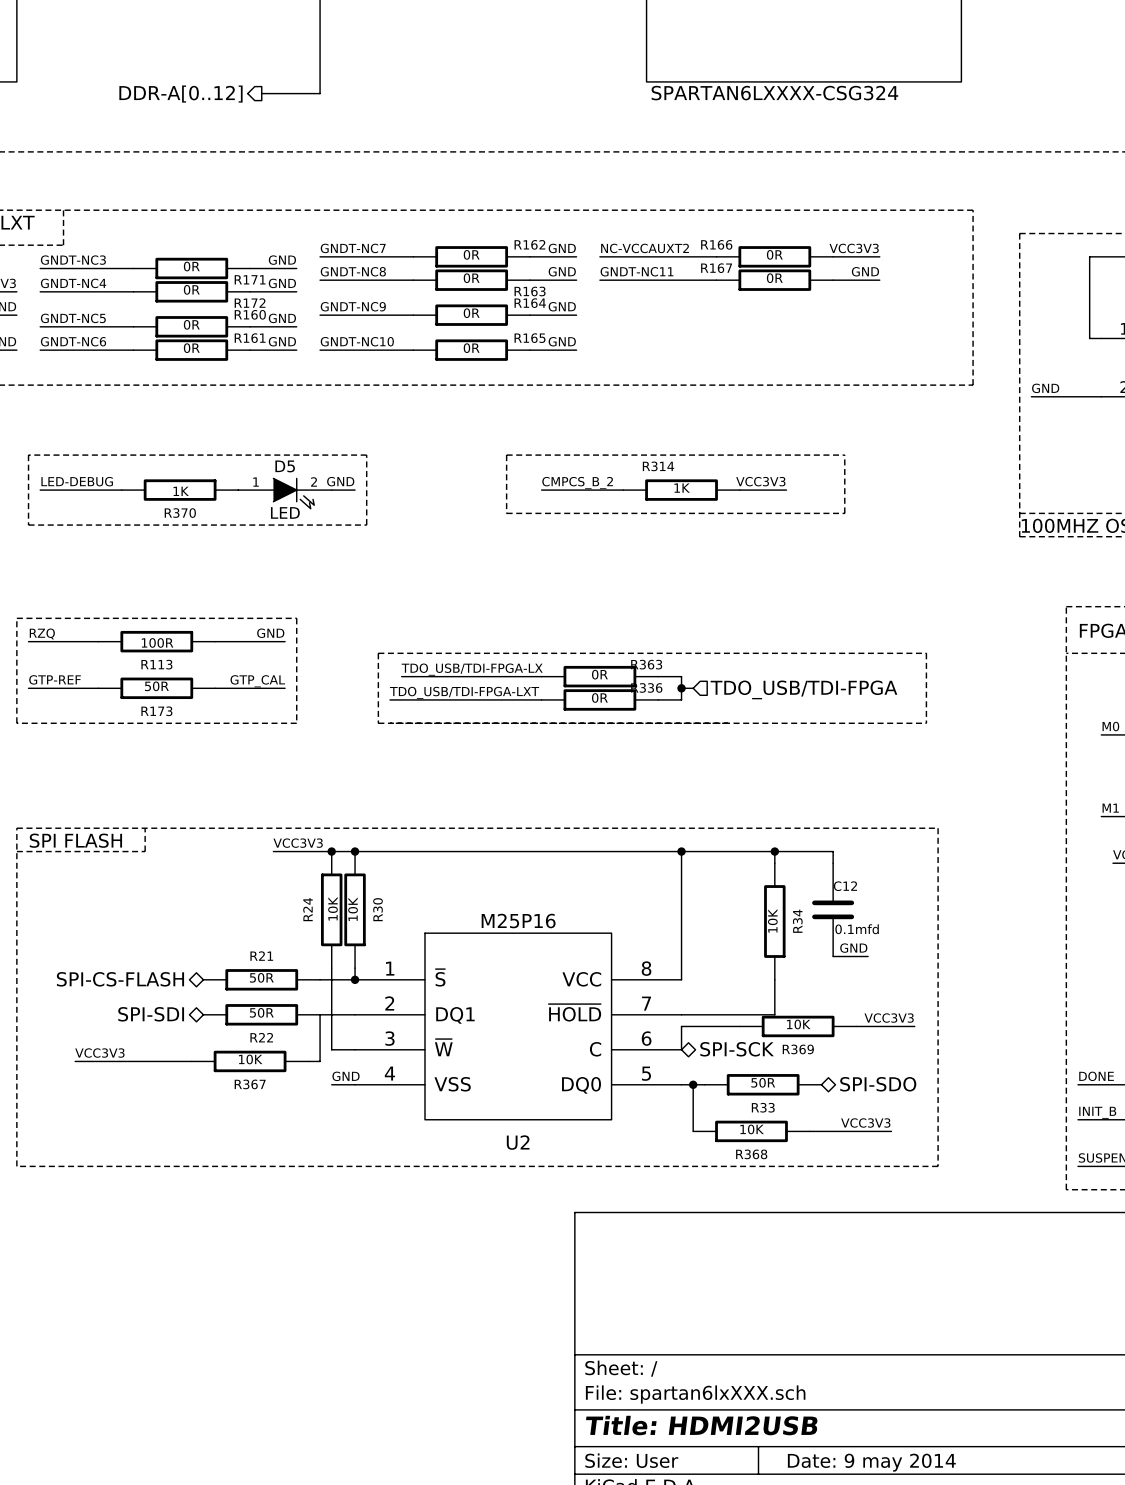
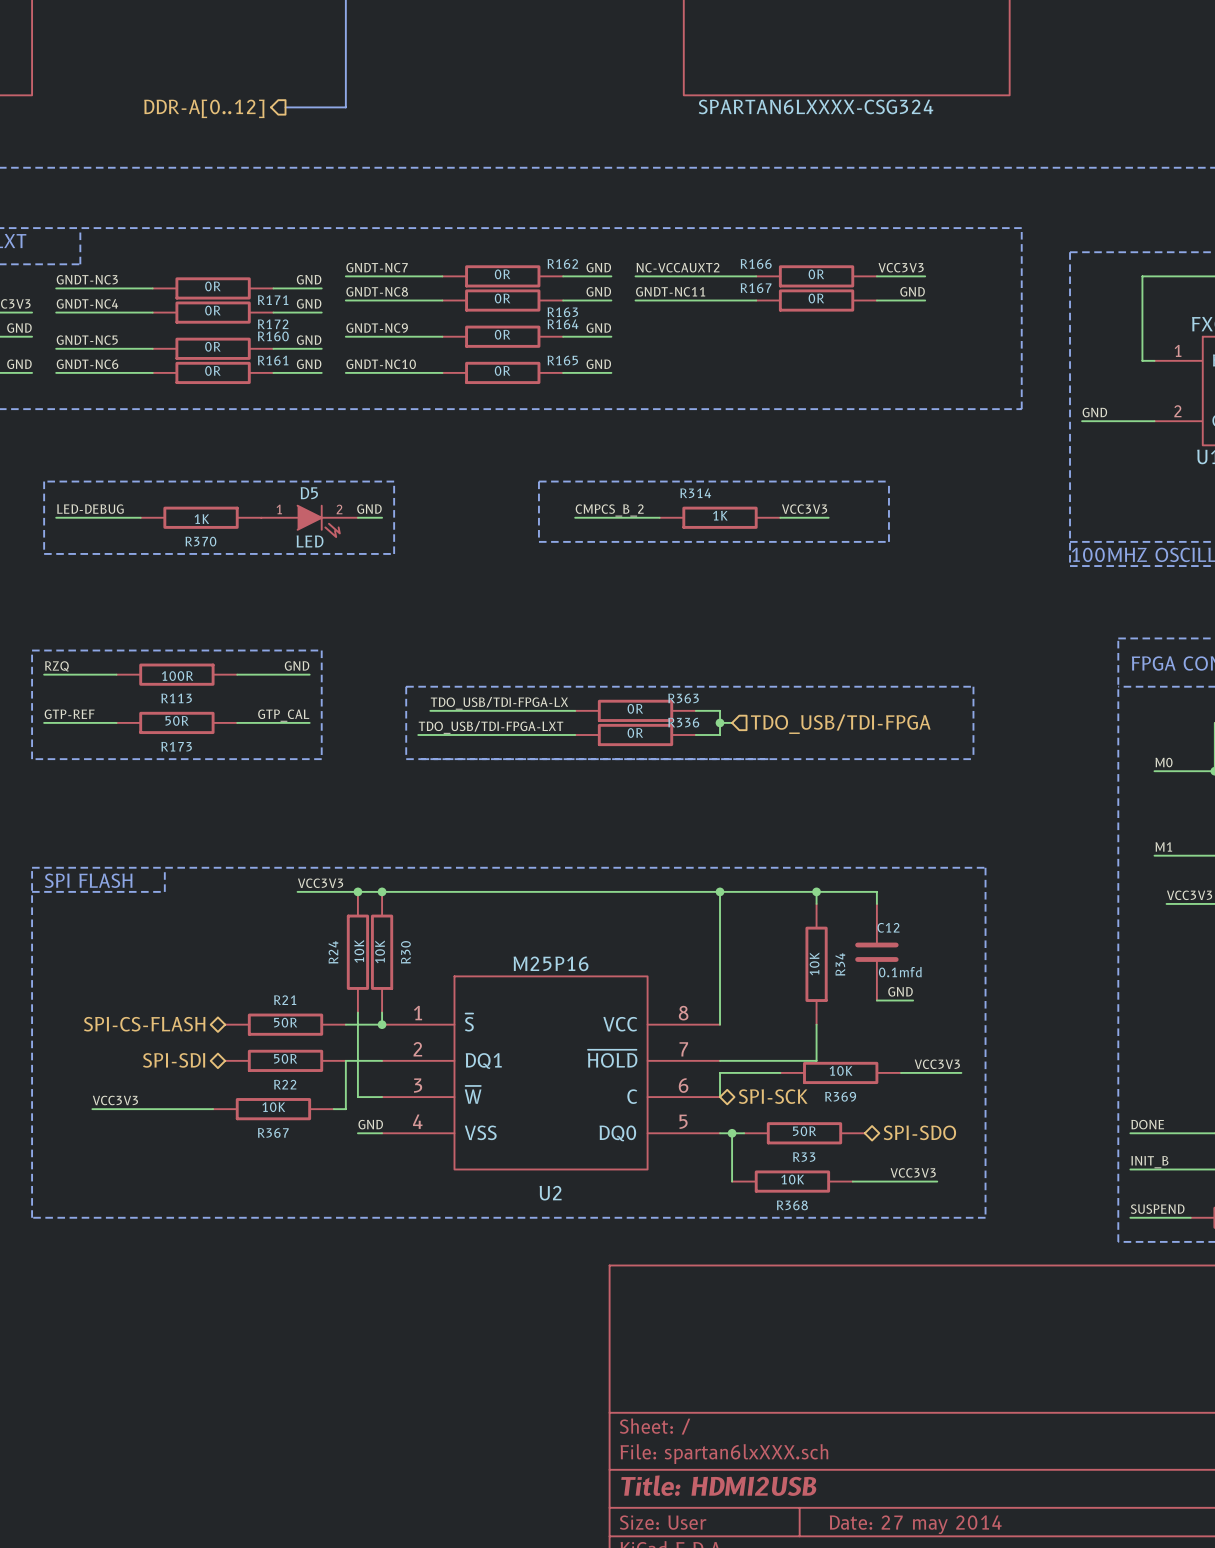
title block: Date: 9 may 2014 (871, 1462) -> Date: 27 may 2014 (915, 1524)

